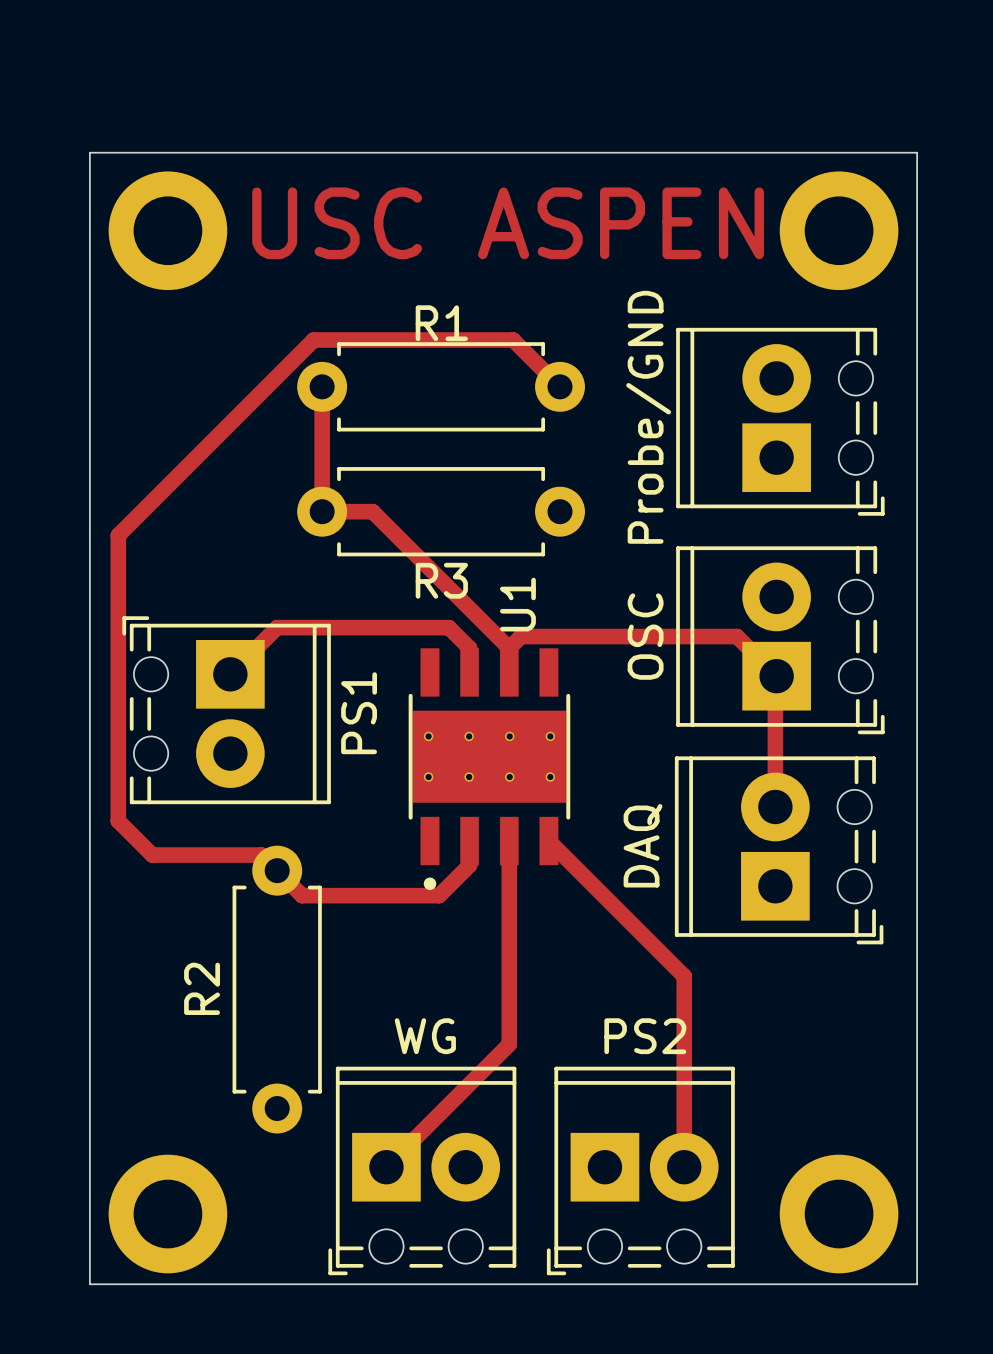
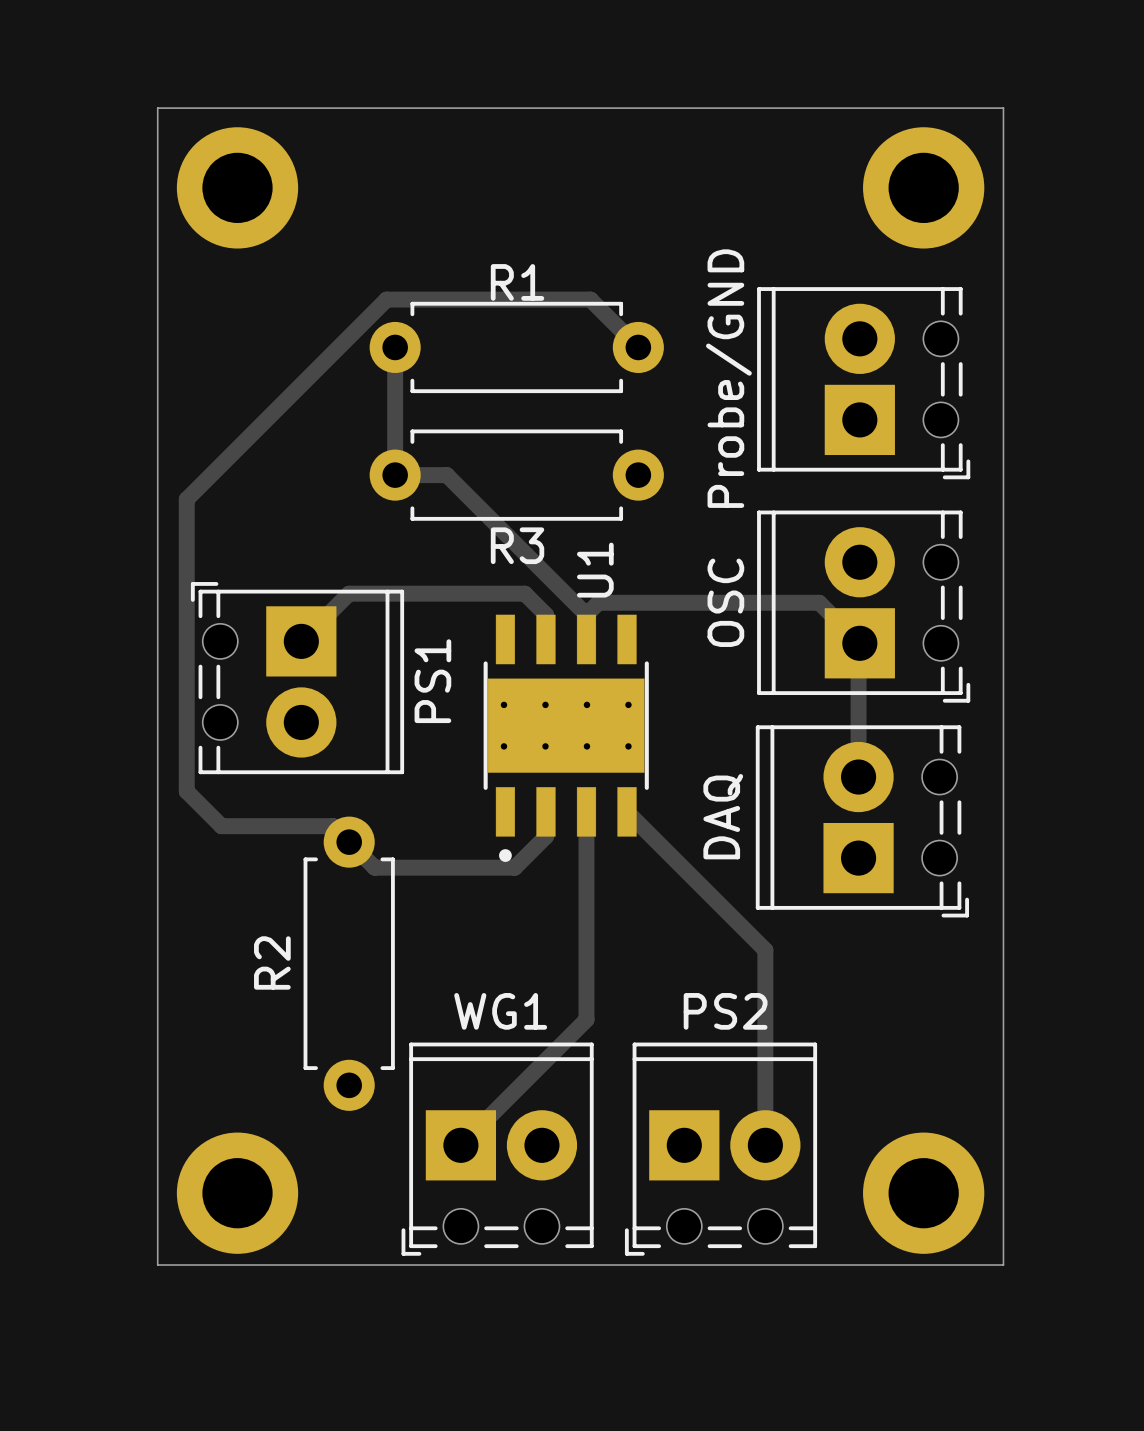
text: USC ASPEN (508, 223) -> none
WG name: WG (425, 1036) -> WG1 (500, 1011)

